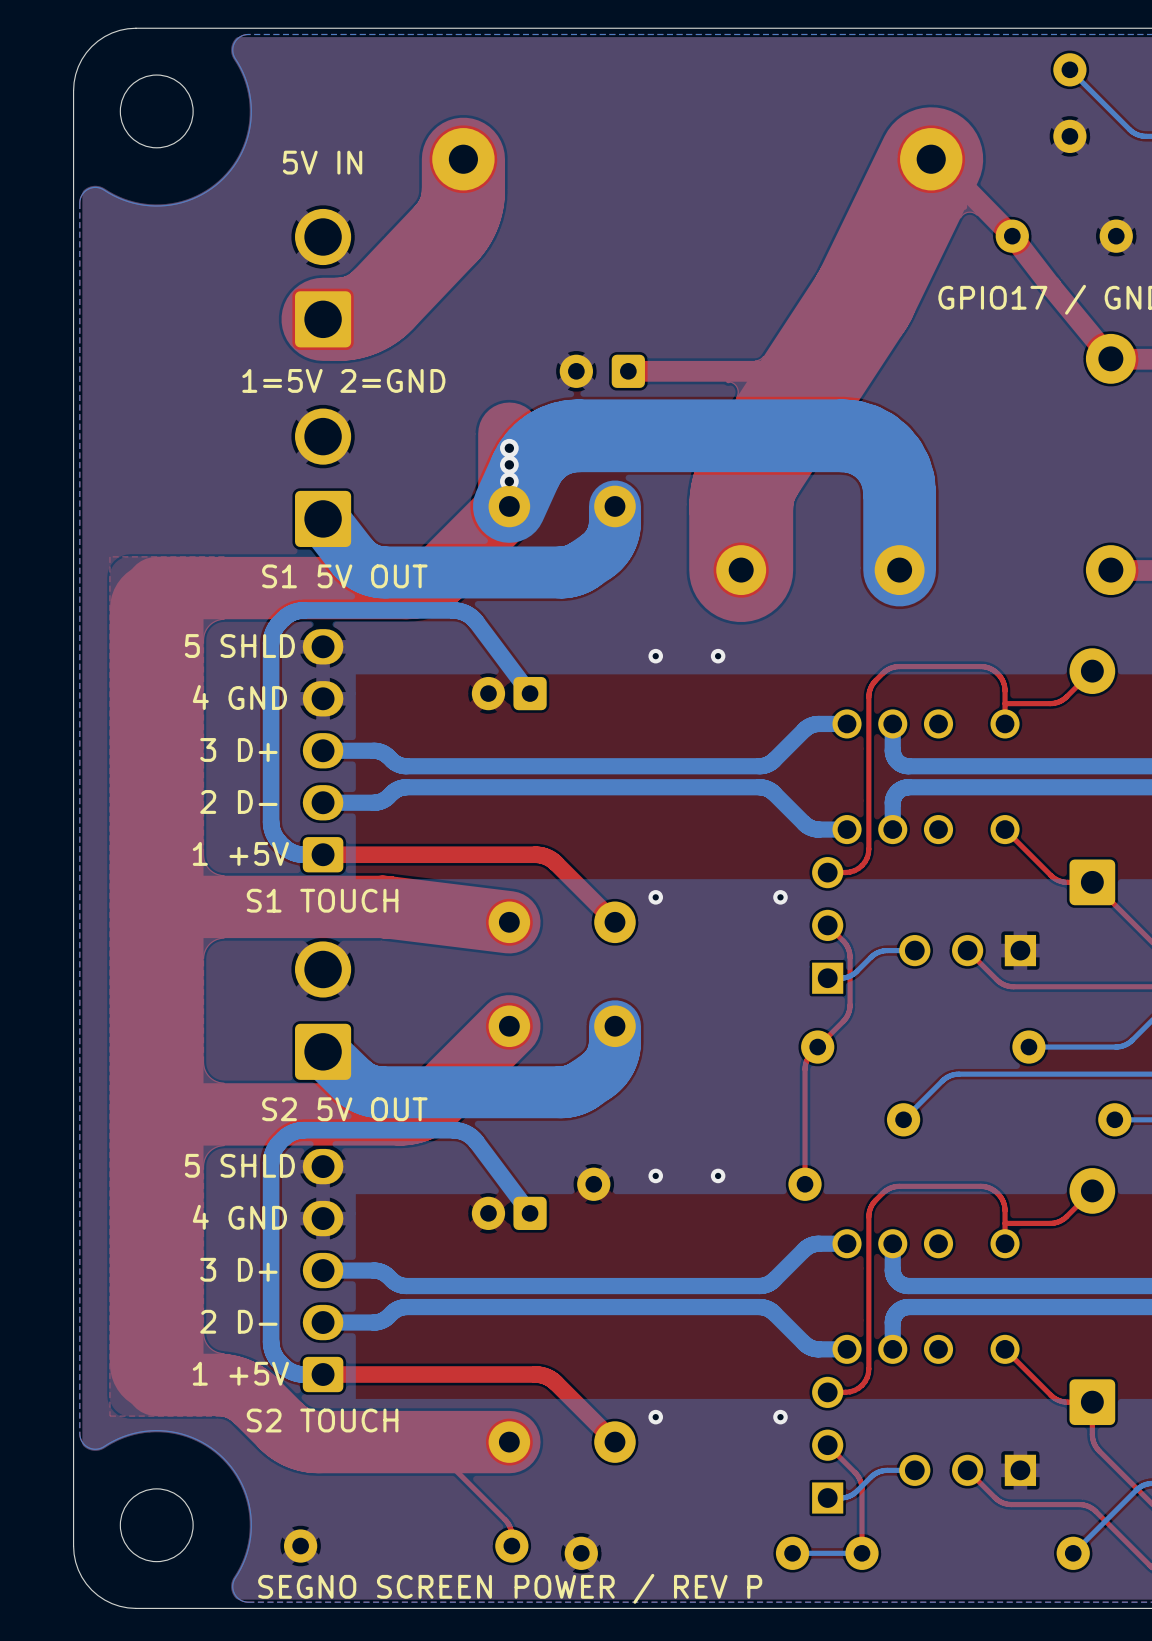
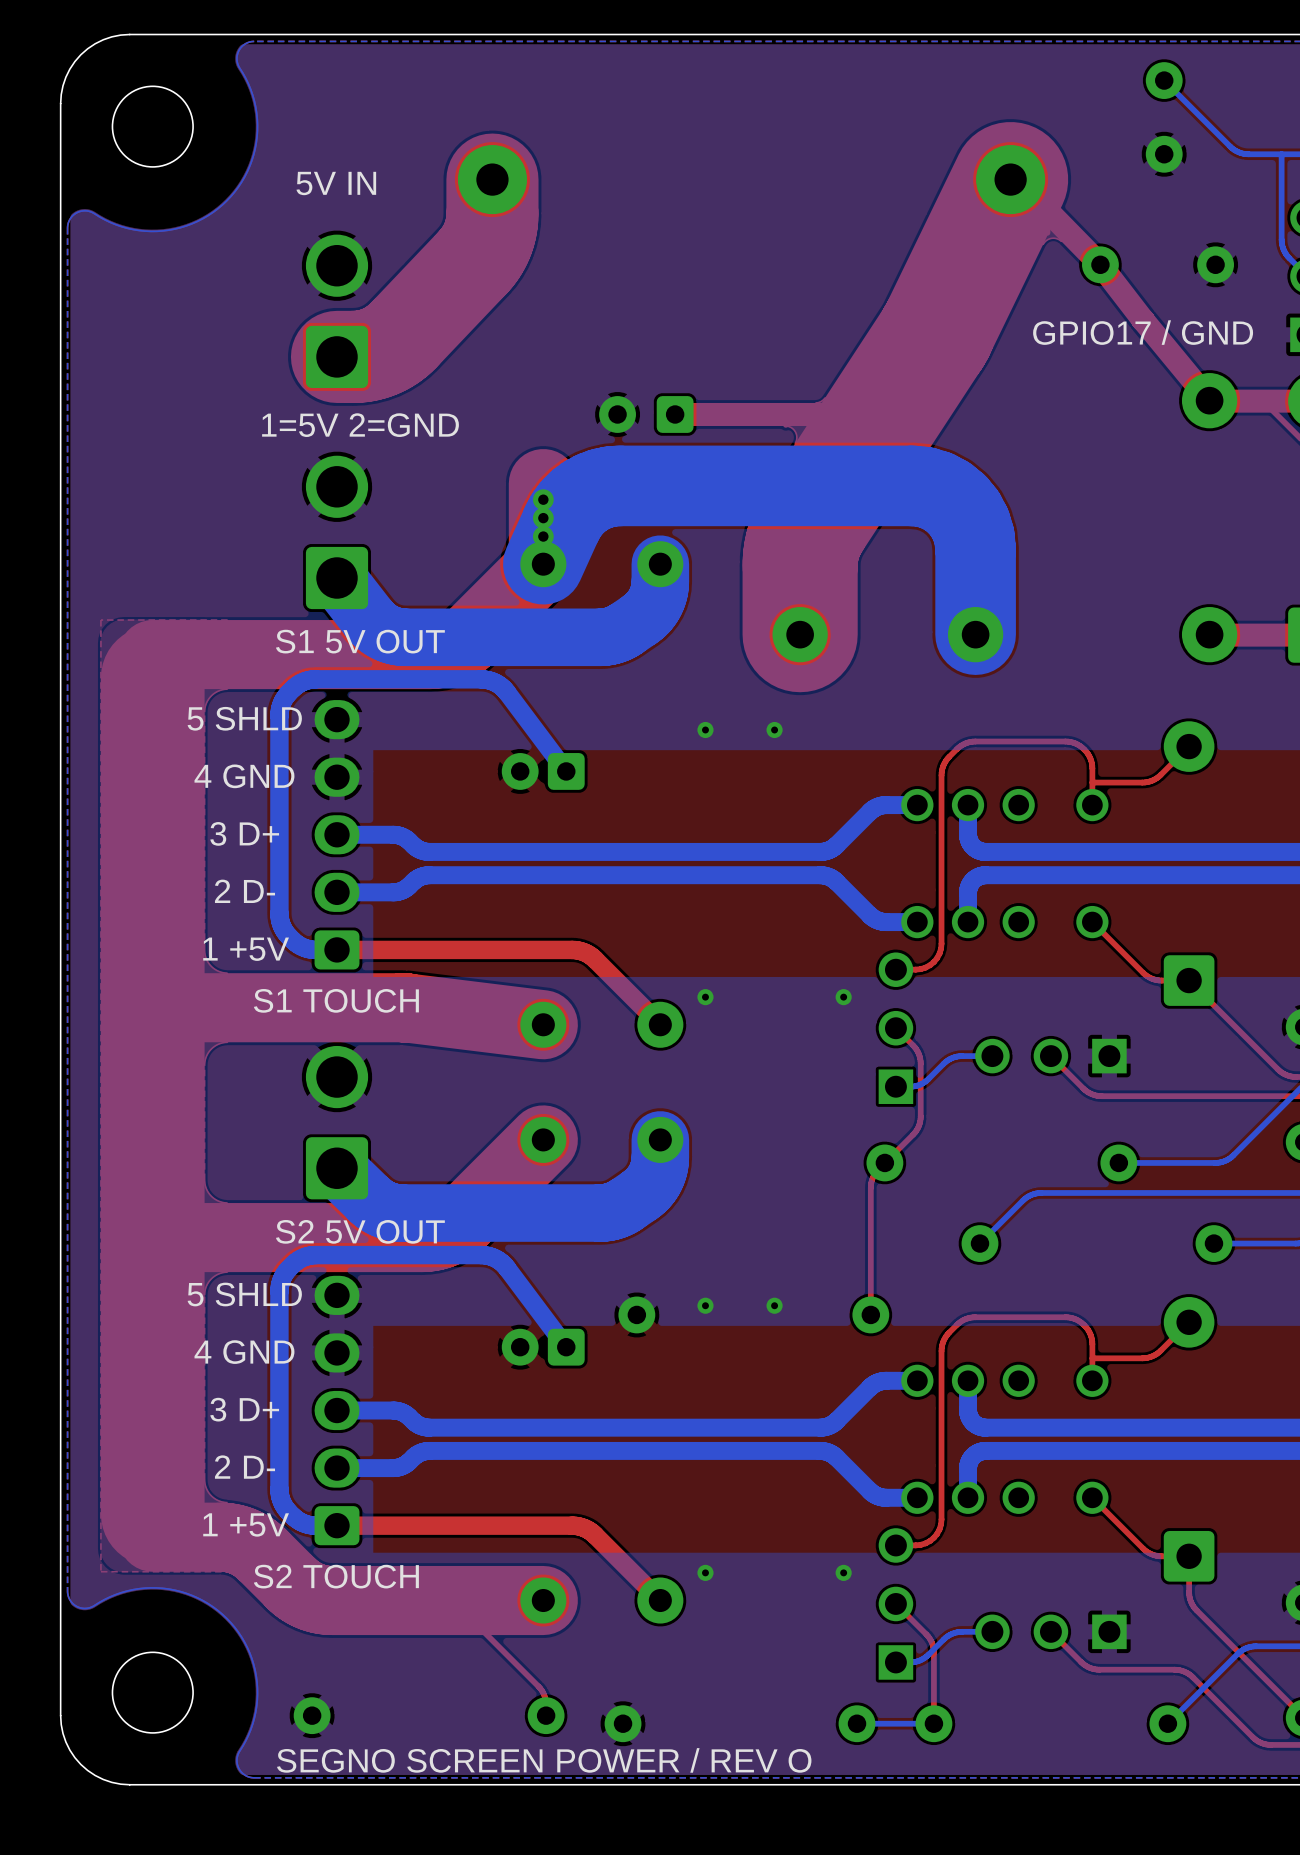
text: SEGNO SCREEN POWER / REV P (510, 1588) -> SEGNO SCREEN POWER / REV O (544, 1760)

